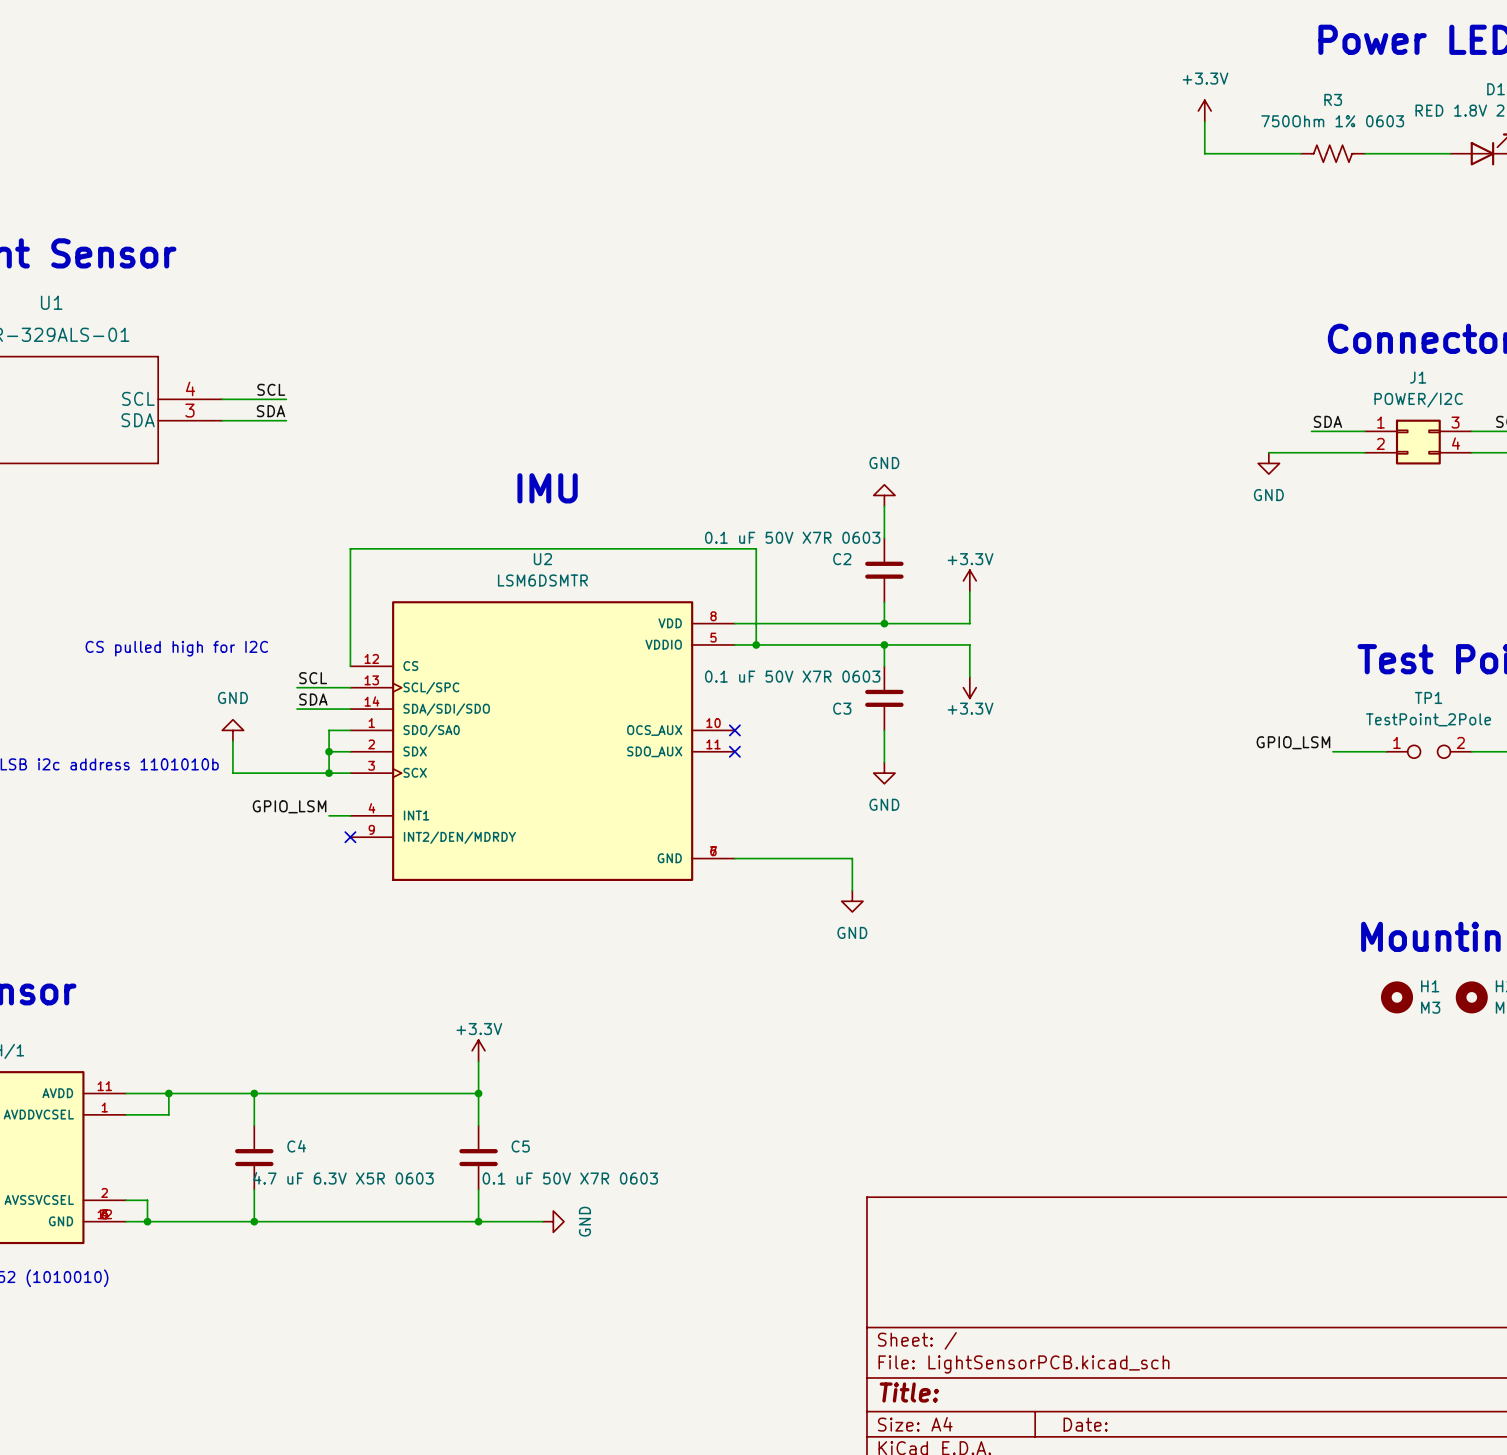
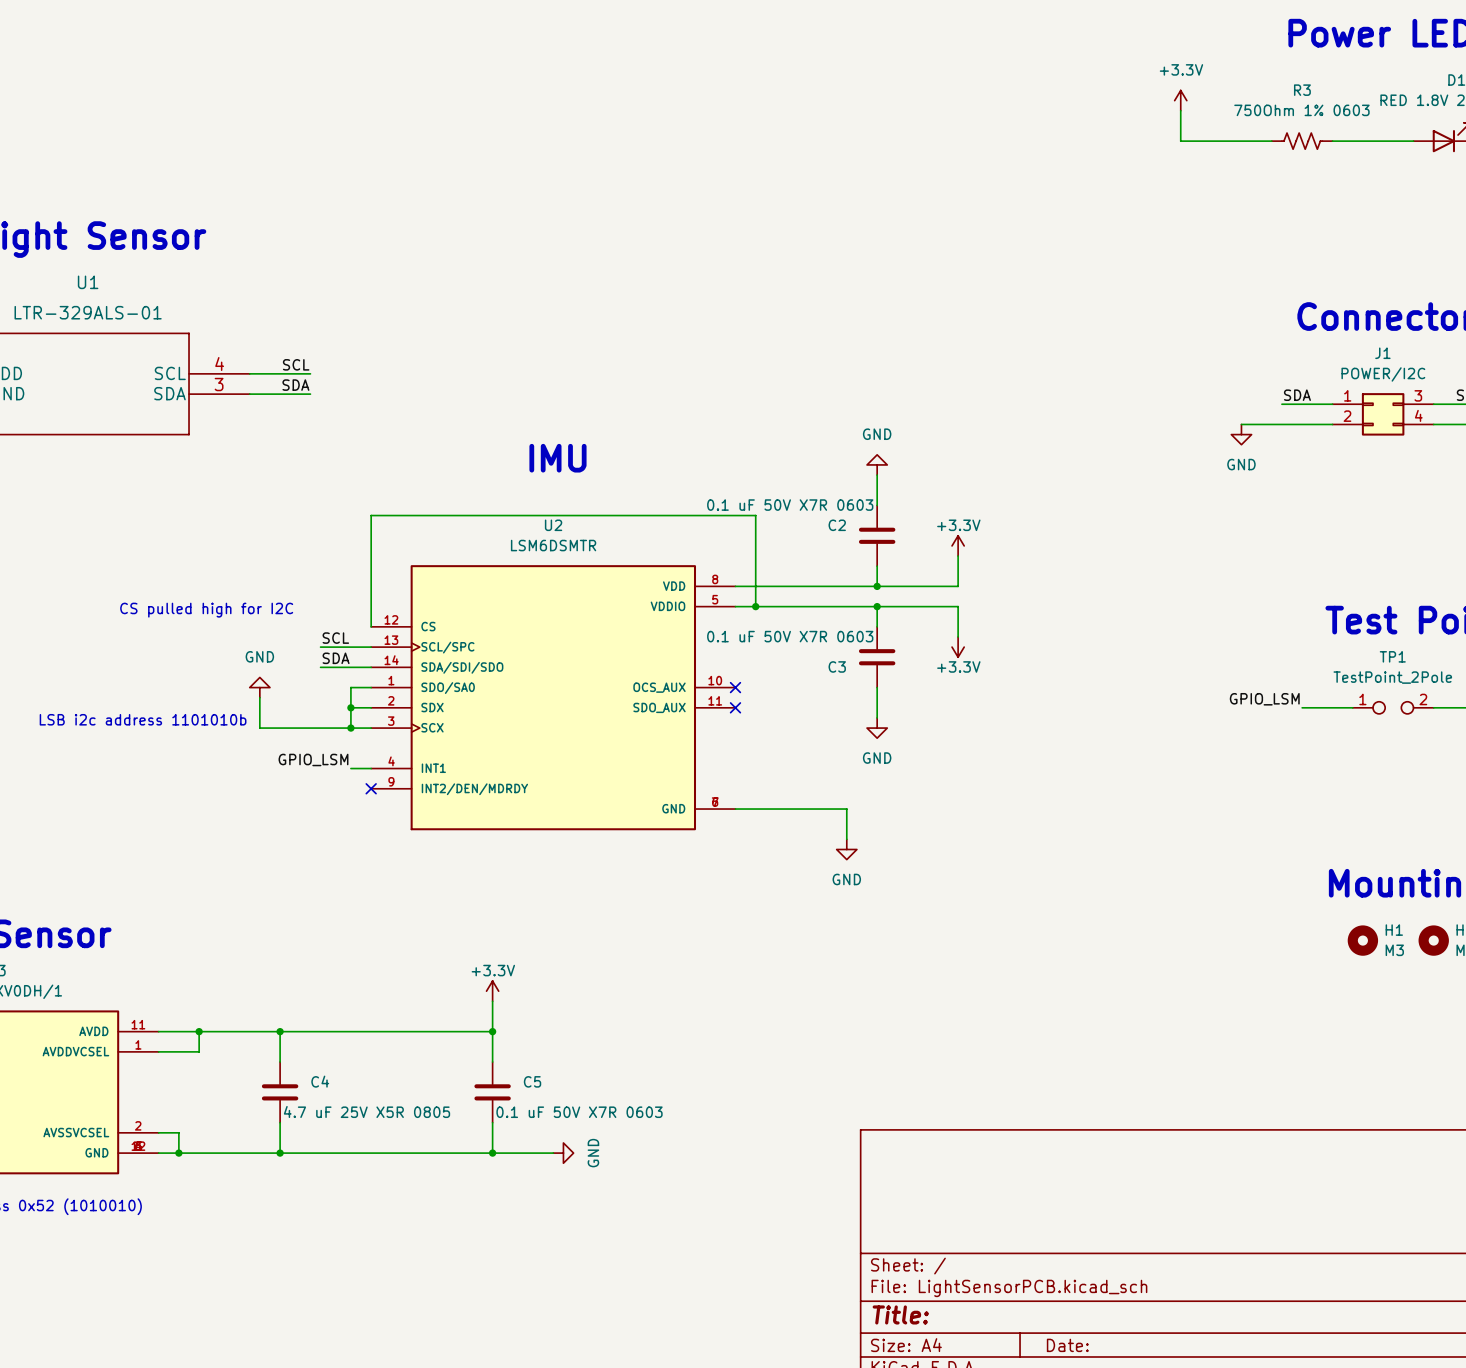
C4 value: 4.7 uF 6.3V X5R 0603 (343, 1178) -> 4.7 uF 25V X5R 0805 (366, 1111)

